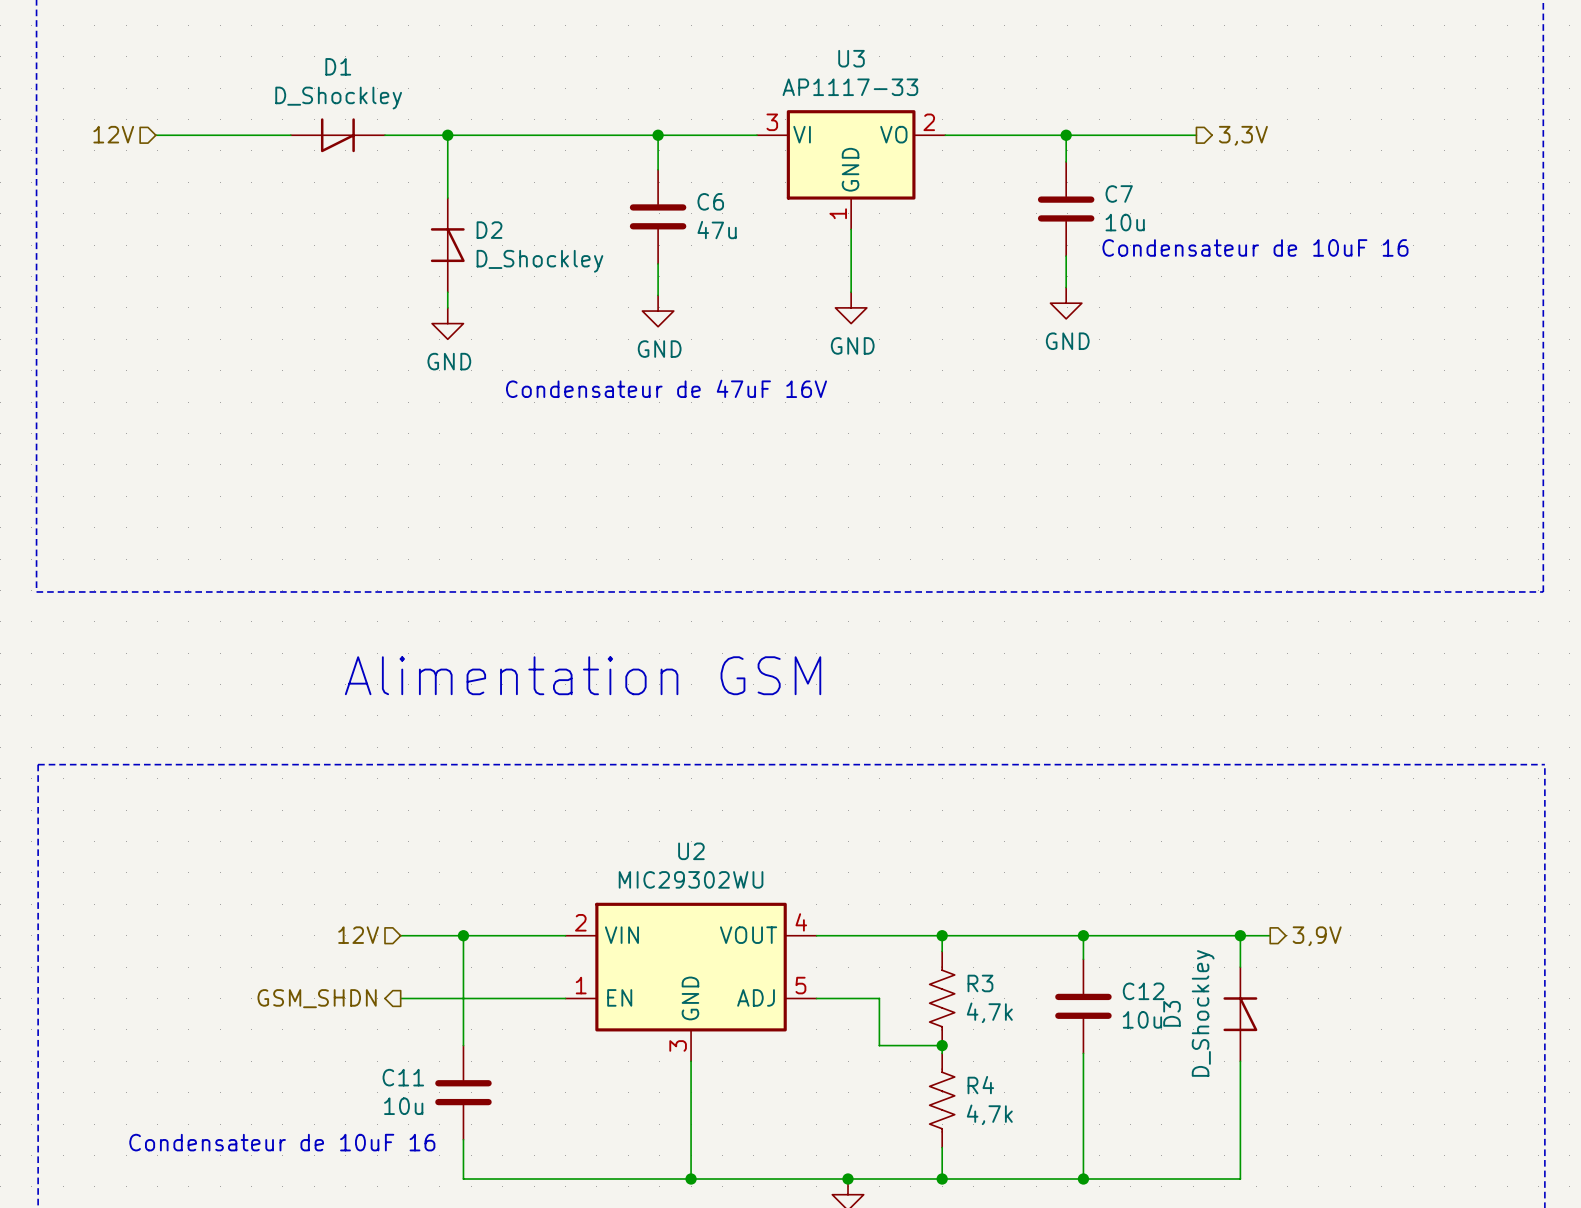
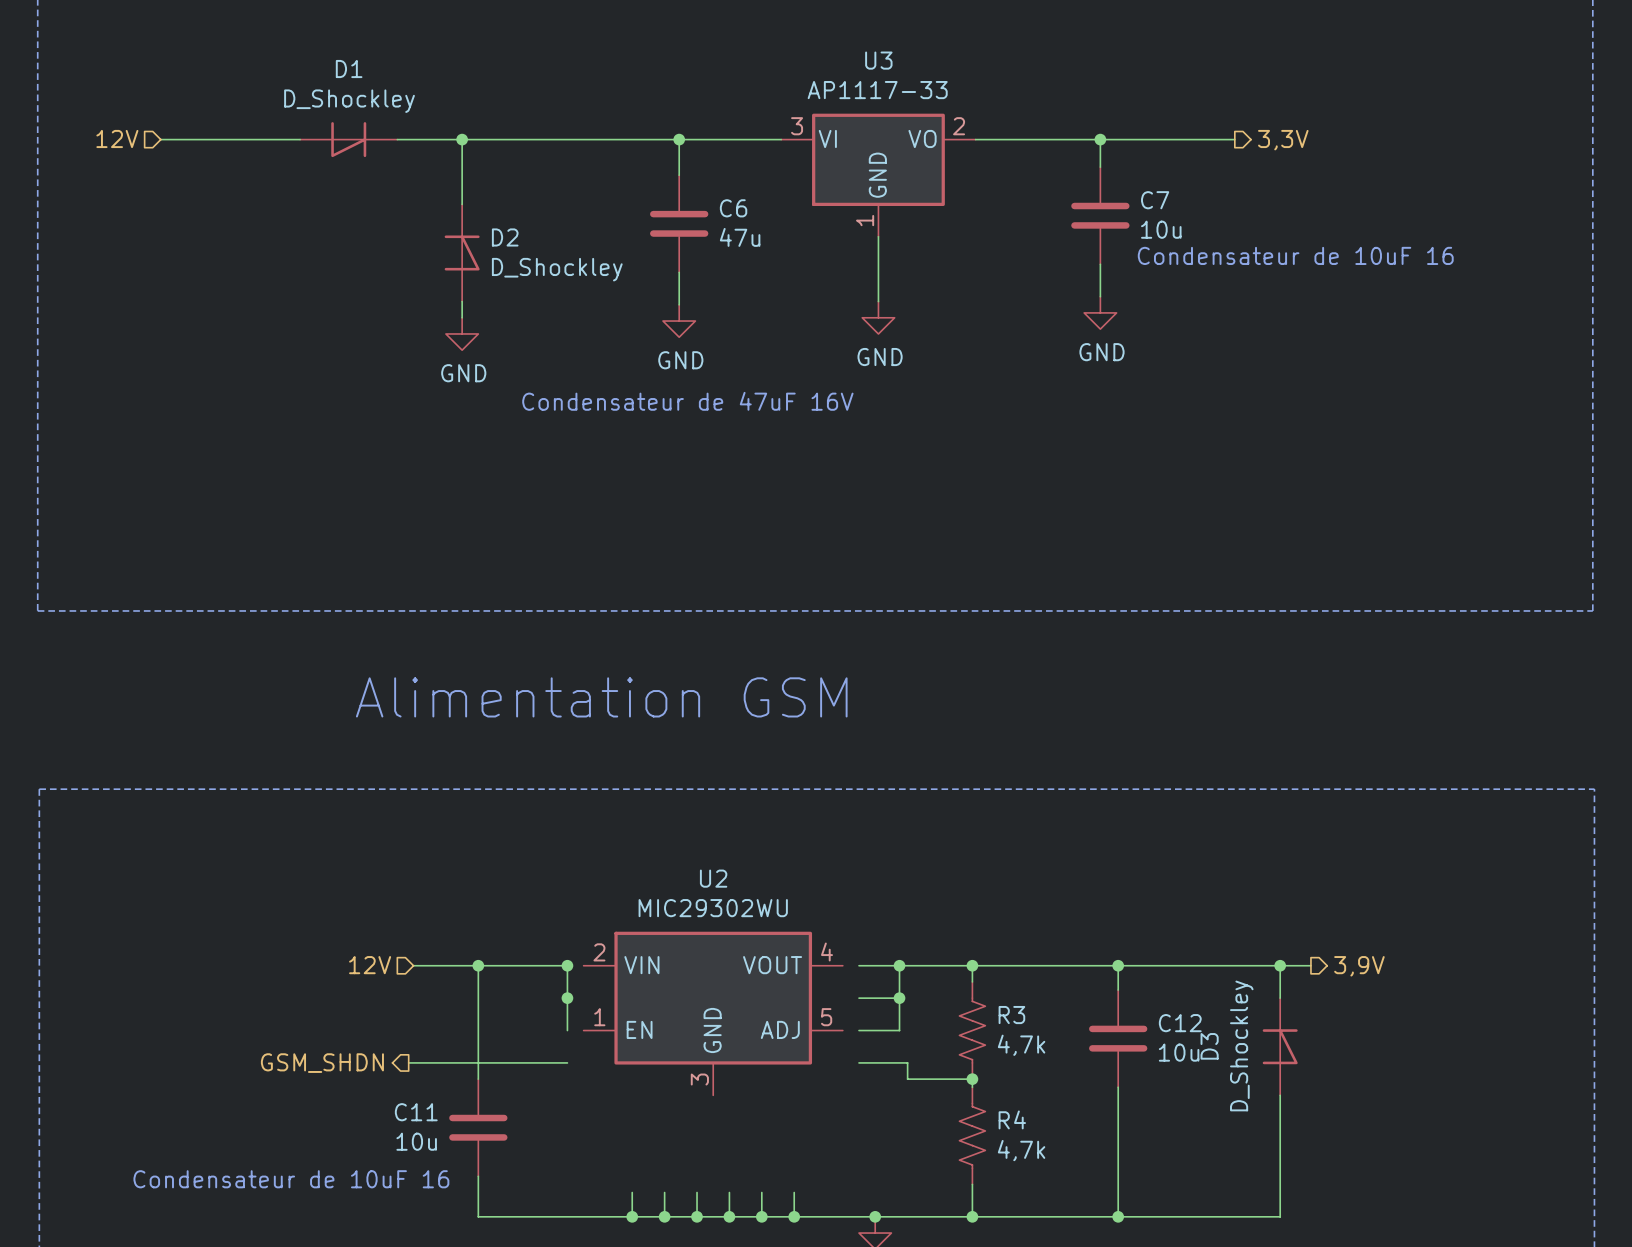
wire: (549, 935) (565, 935) -> (567, 965) (567, 1030)
junction: none -> (567, 965)
wire: (816, 935) (832, 935) -> none
wire: none -> (899, 965) (899, 1030)
junction: none -> (899, 965)
junction: none -> (567, 998)
wire: none -> (859, 998) (899, 998)
junction: none -> (899, 998)
hierarchical label position: GSM_SHDN (317, 998) -> GSM_SHDN (322, 1063)
wire: (400, 998) (565, 998) -> none
wire: (816, 998) (832, 998) -> none
wire: (871, 998) (879, 998) (879, 1029) -> (859, 1062) (907, 1062)
wire: none -> (408, 1062) (567, 1062)
wire: (691, 1061) (691, 1179) -> none
wire: none -> (632, 1192) (632, 1216)
wire: none -> (664, 1192) (664, 1216)
wire: none -> (697, 1192) (697, 1216)
wire: none -> (729, 1192) (729, 1216)
wire: none -> (761, 1192) (761, 1216)
wire: none -> (794, 1192) (794, 1216)
junction: none -> (632, 1216)
junction: none -> (664, 1216)
junction: none -> (697, 1216)
junction: (691, 1179) -> none
junction: none -> (729, 1216)
junction: none -> (761, 1216)
junction: none -> (794, 1216)

